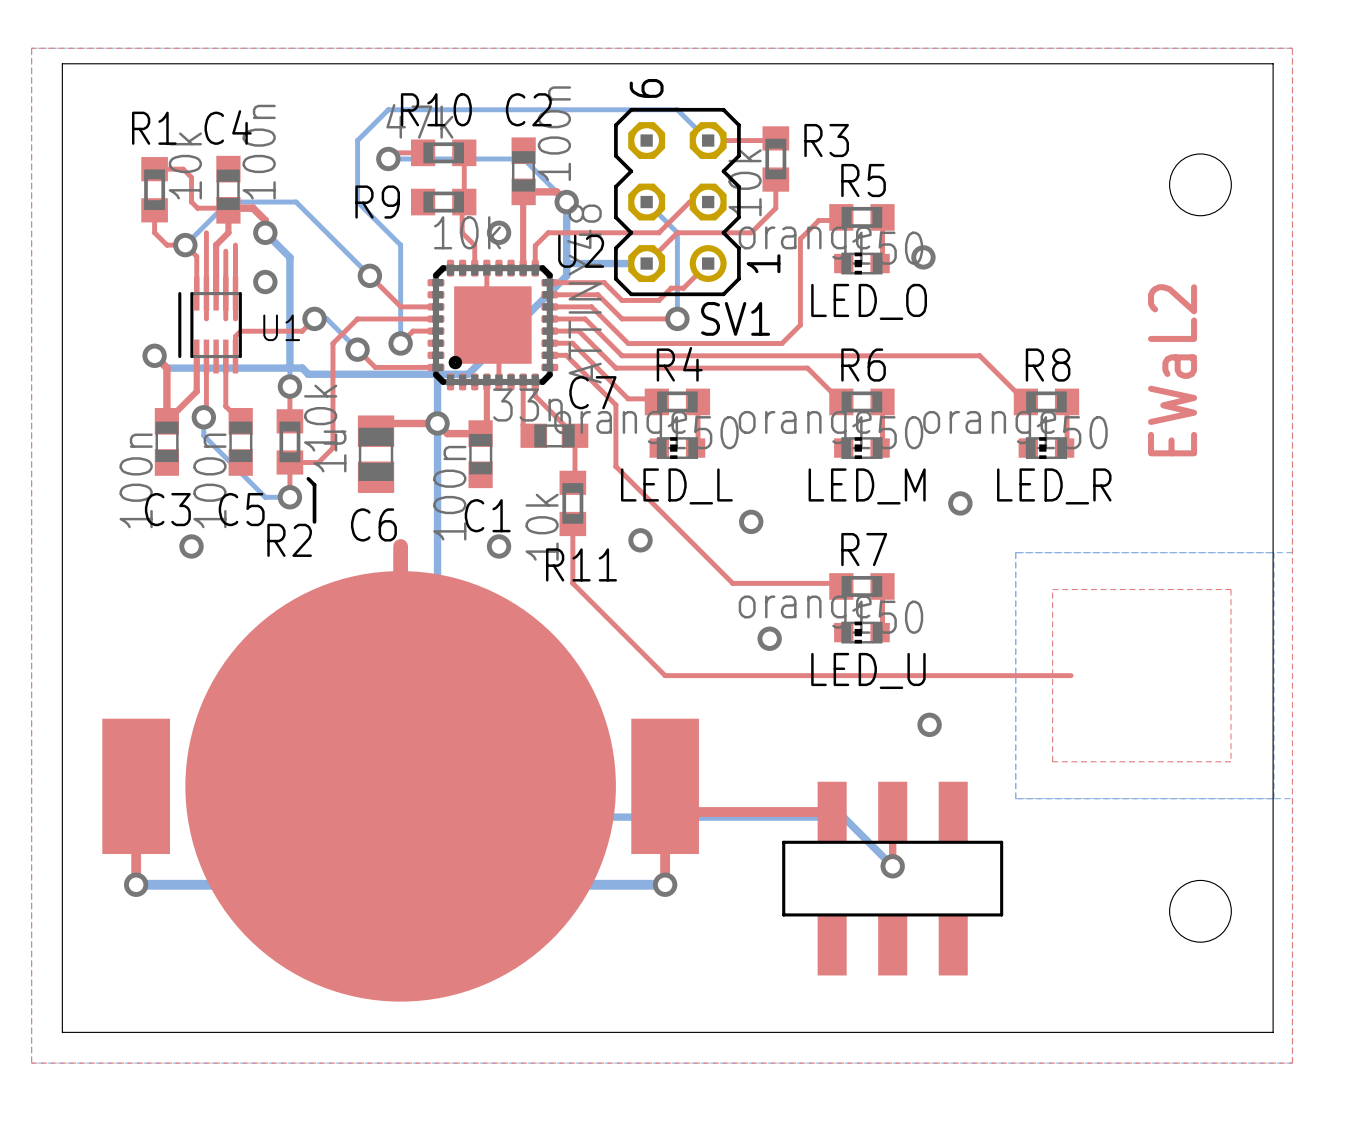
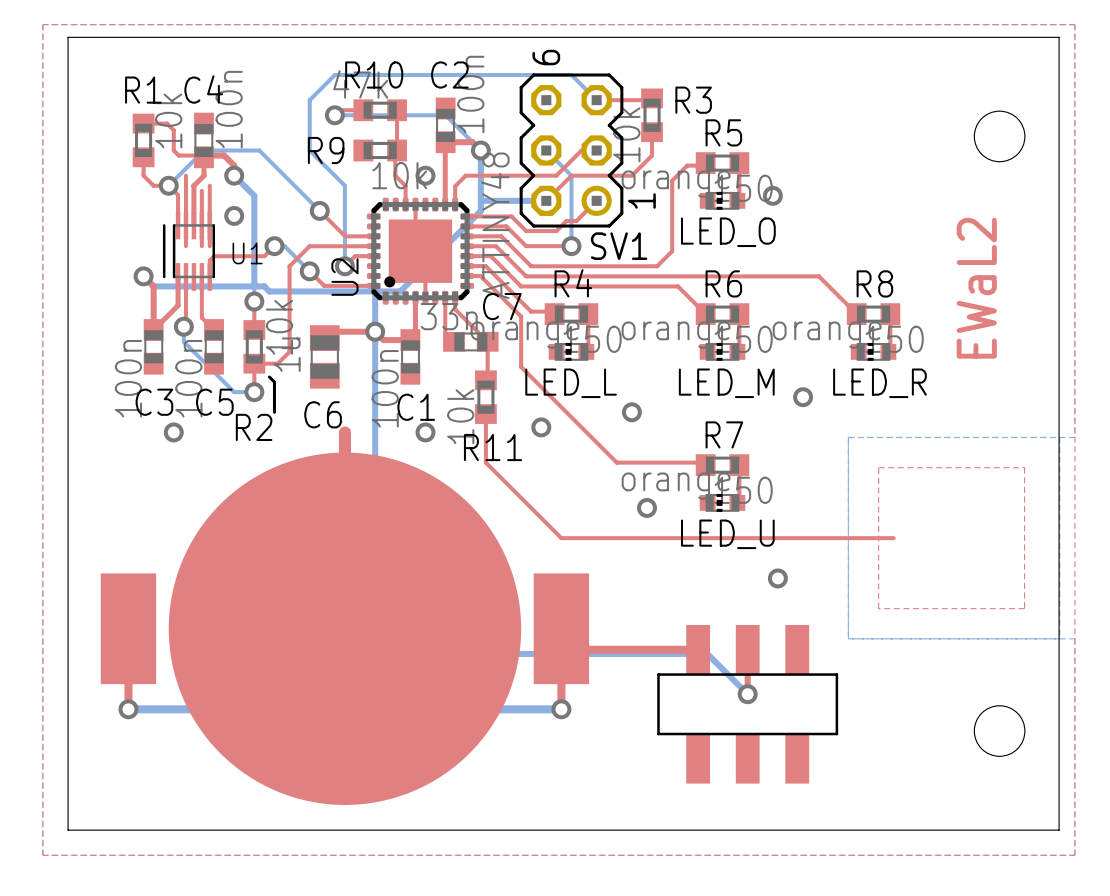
U2 name rotation: 0° (581, 251) -> 90° counterclockwise (344, 277)
U2 name position: U2 (581, 251) -> U2 (344, 277)

